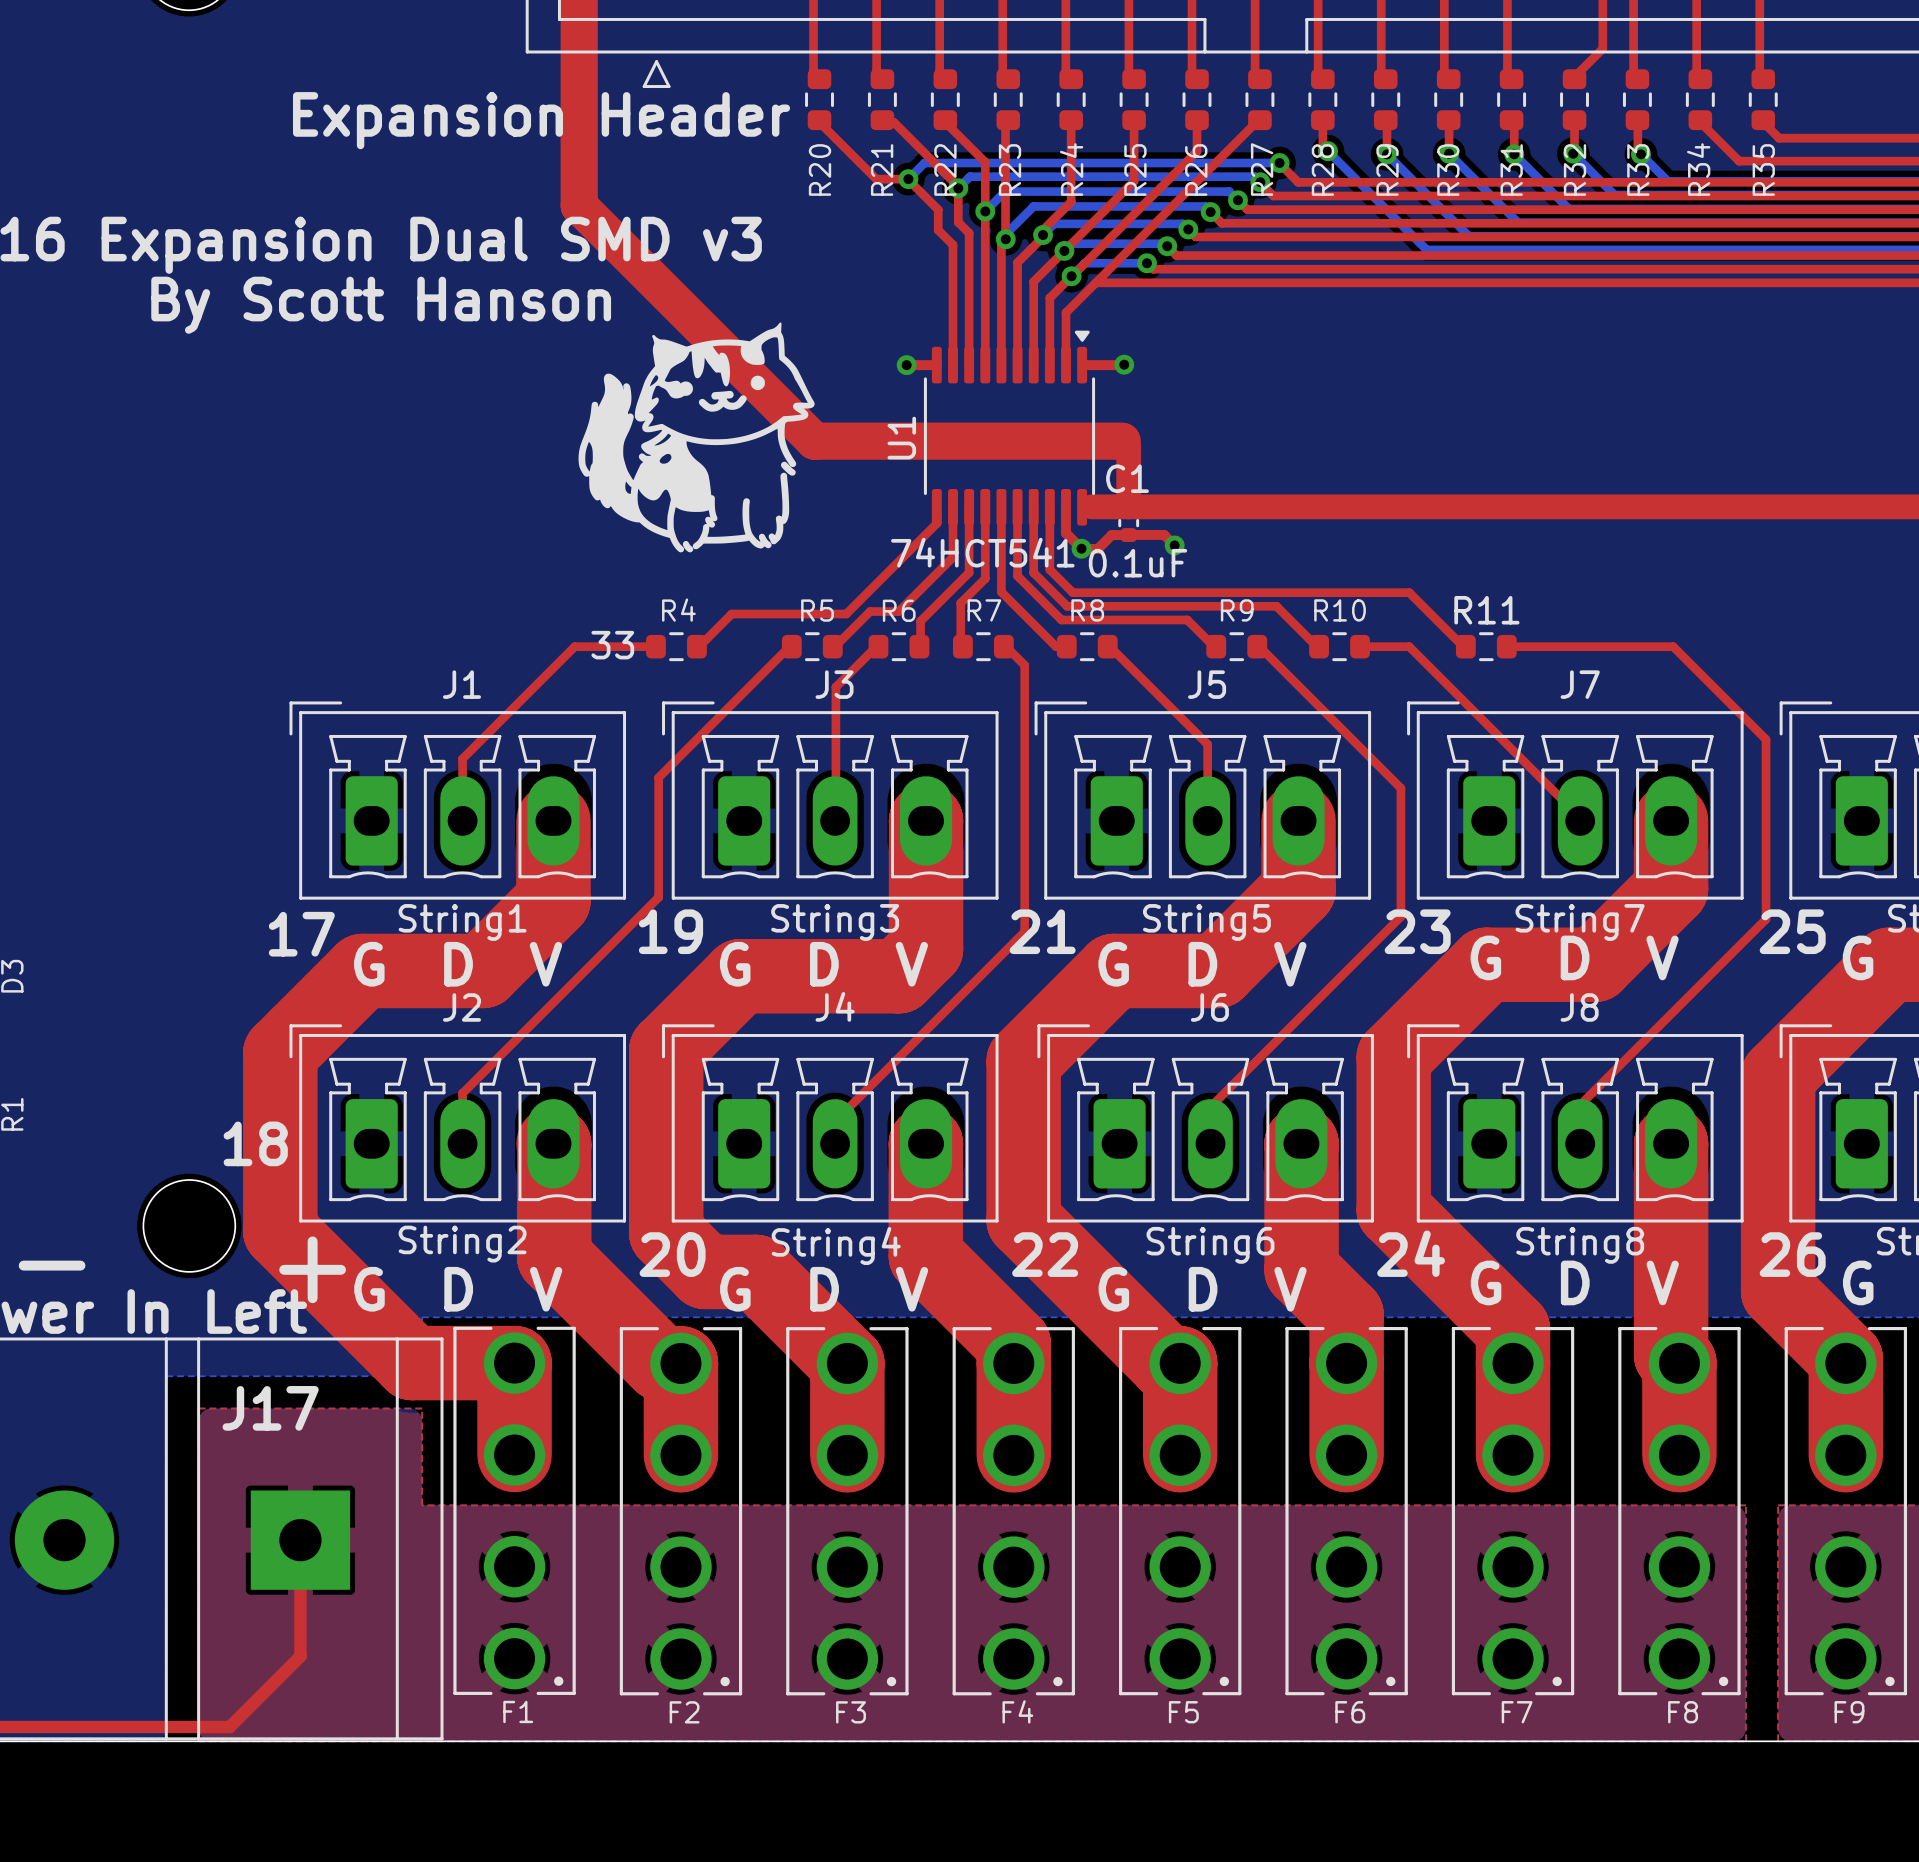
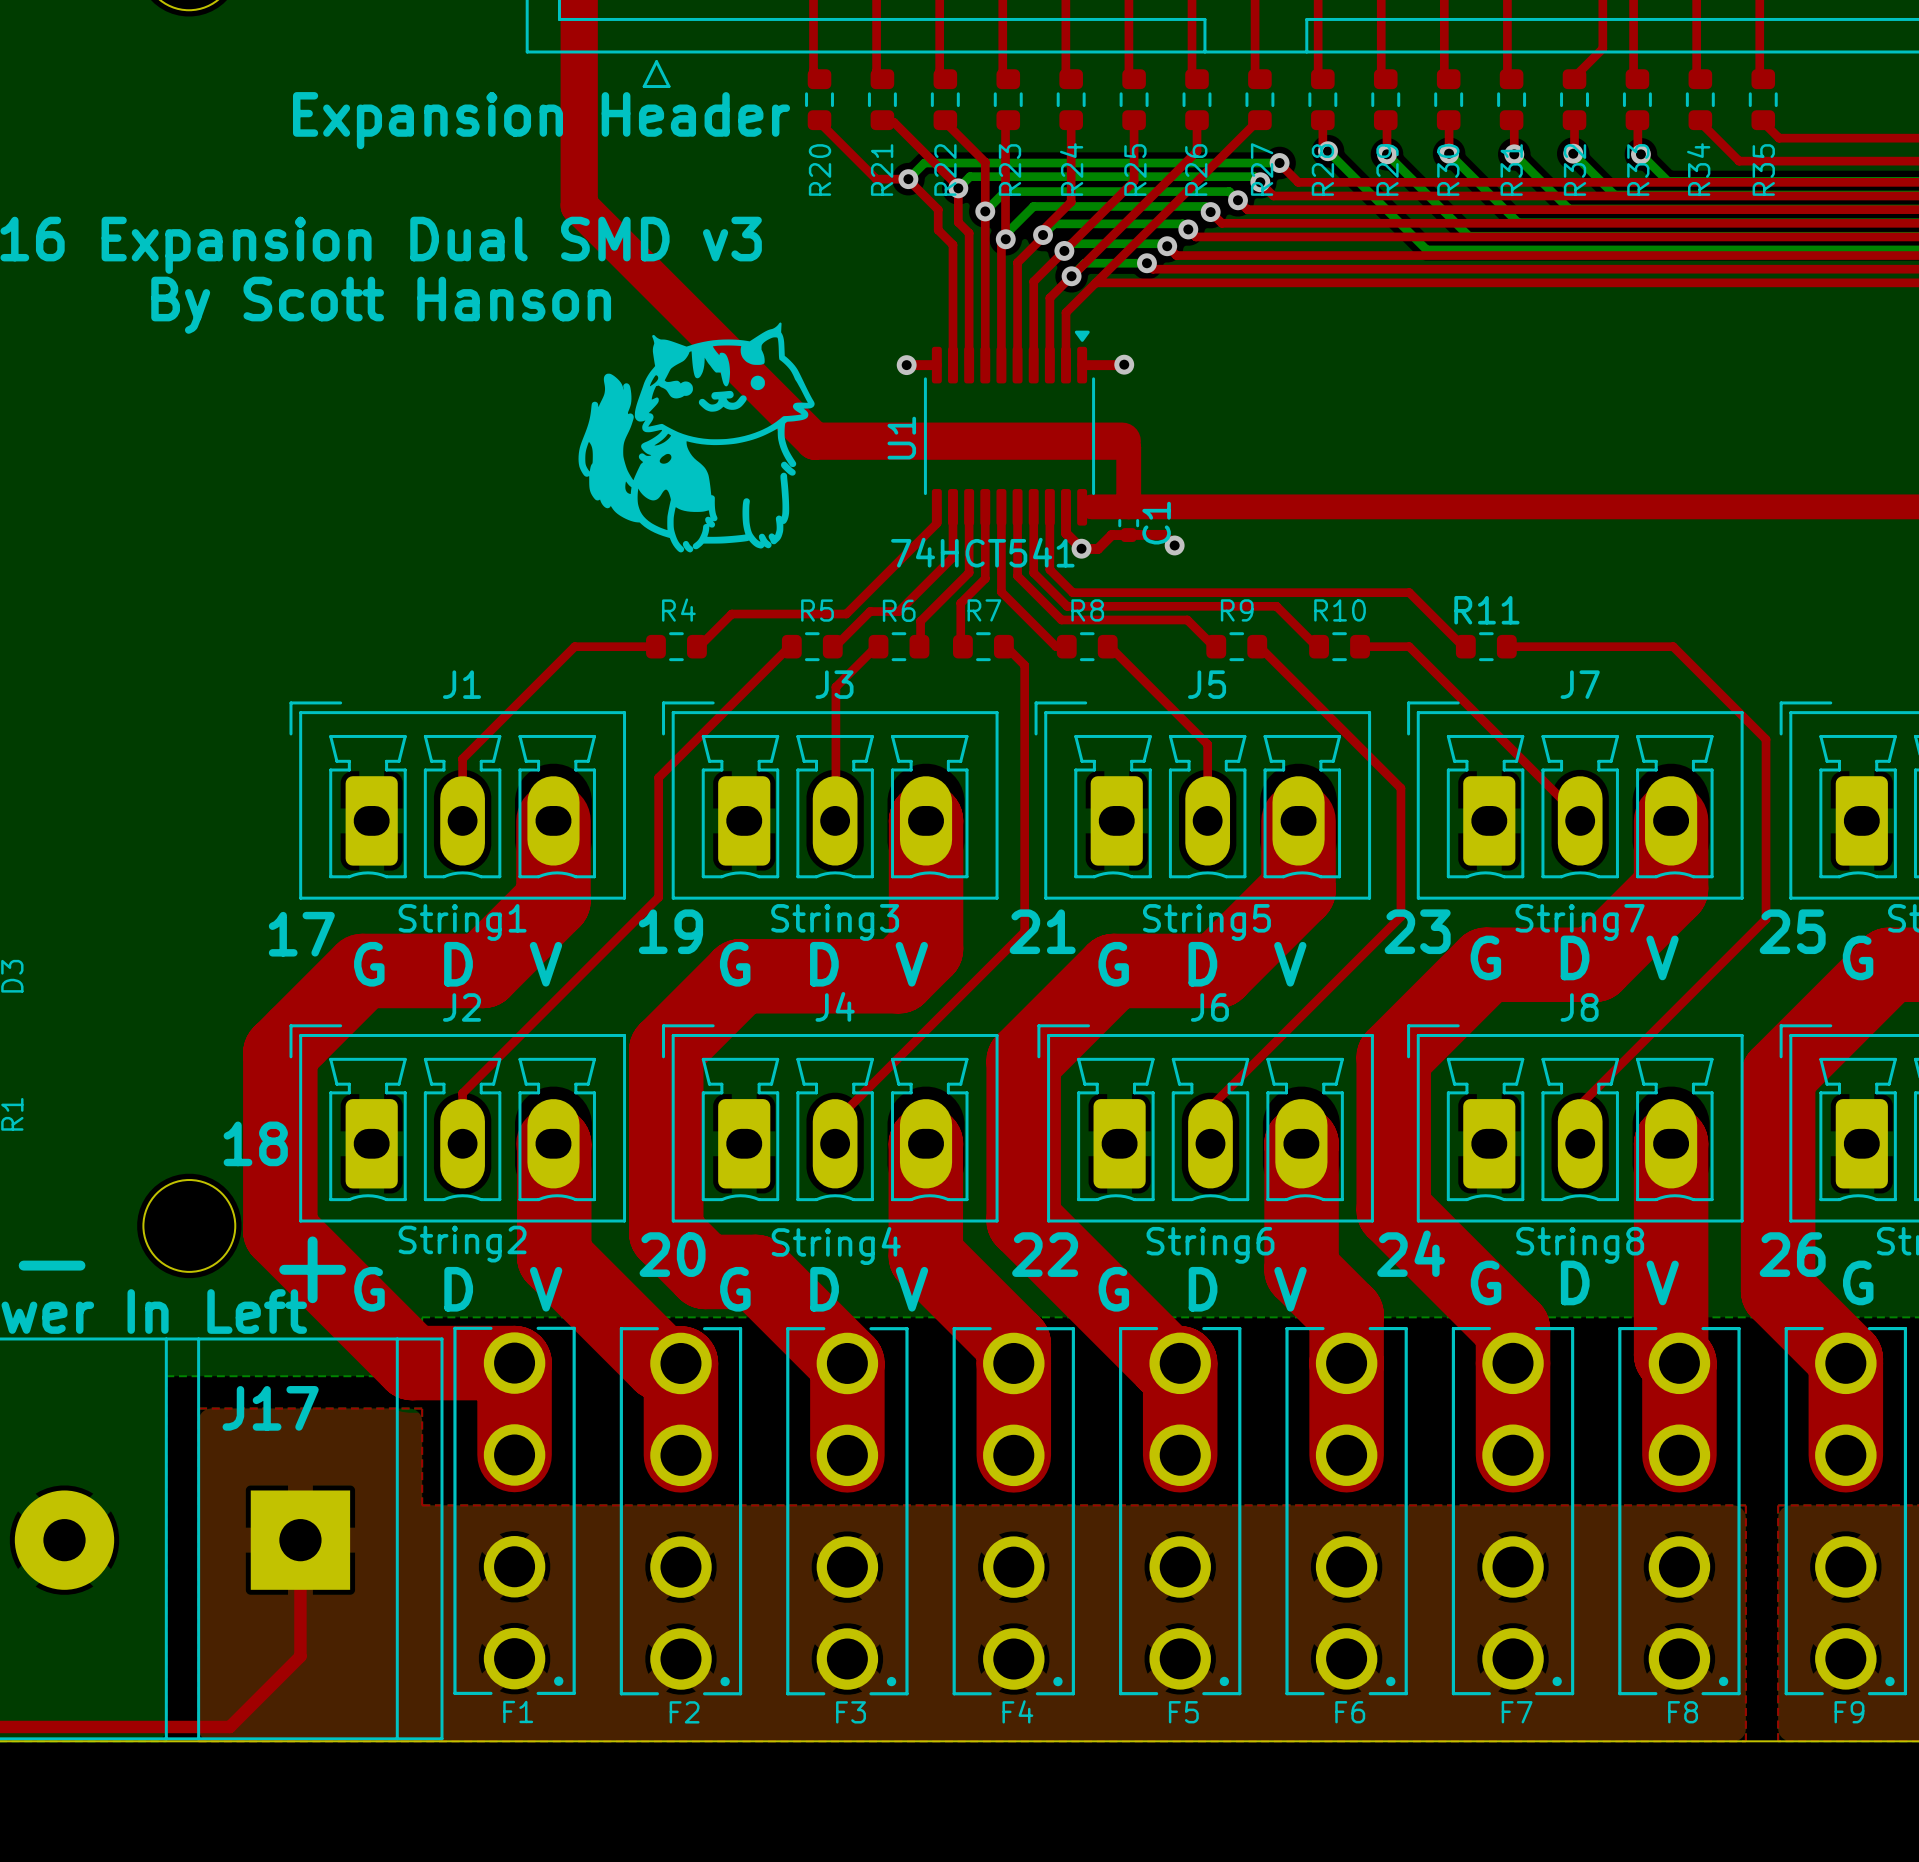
C1 name rotation: 0° (1127, 478) -> 90° counterclockwise (1156, 523)
C1 value: 0.1uF (1137, 563) -> none
R4 value: 33 (612, 645) -> none

